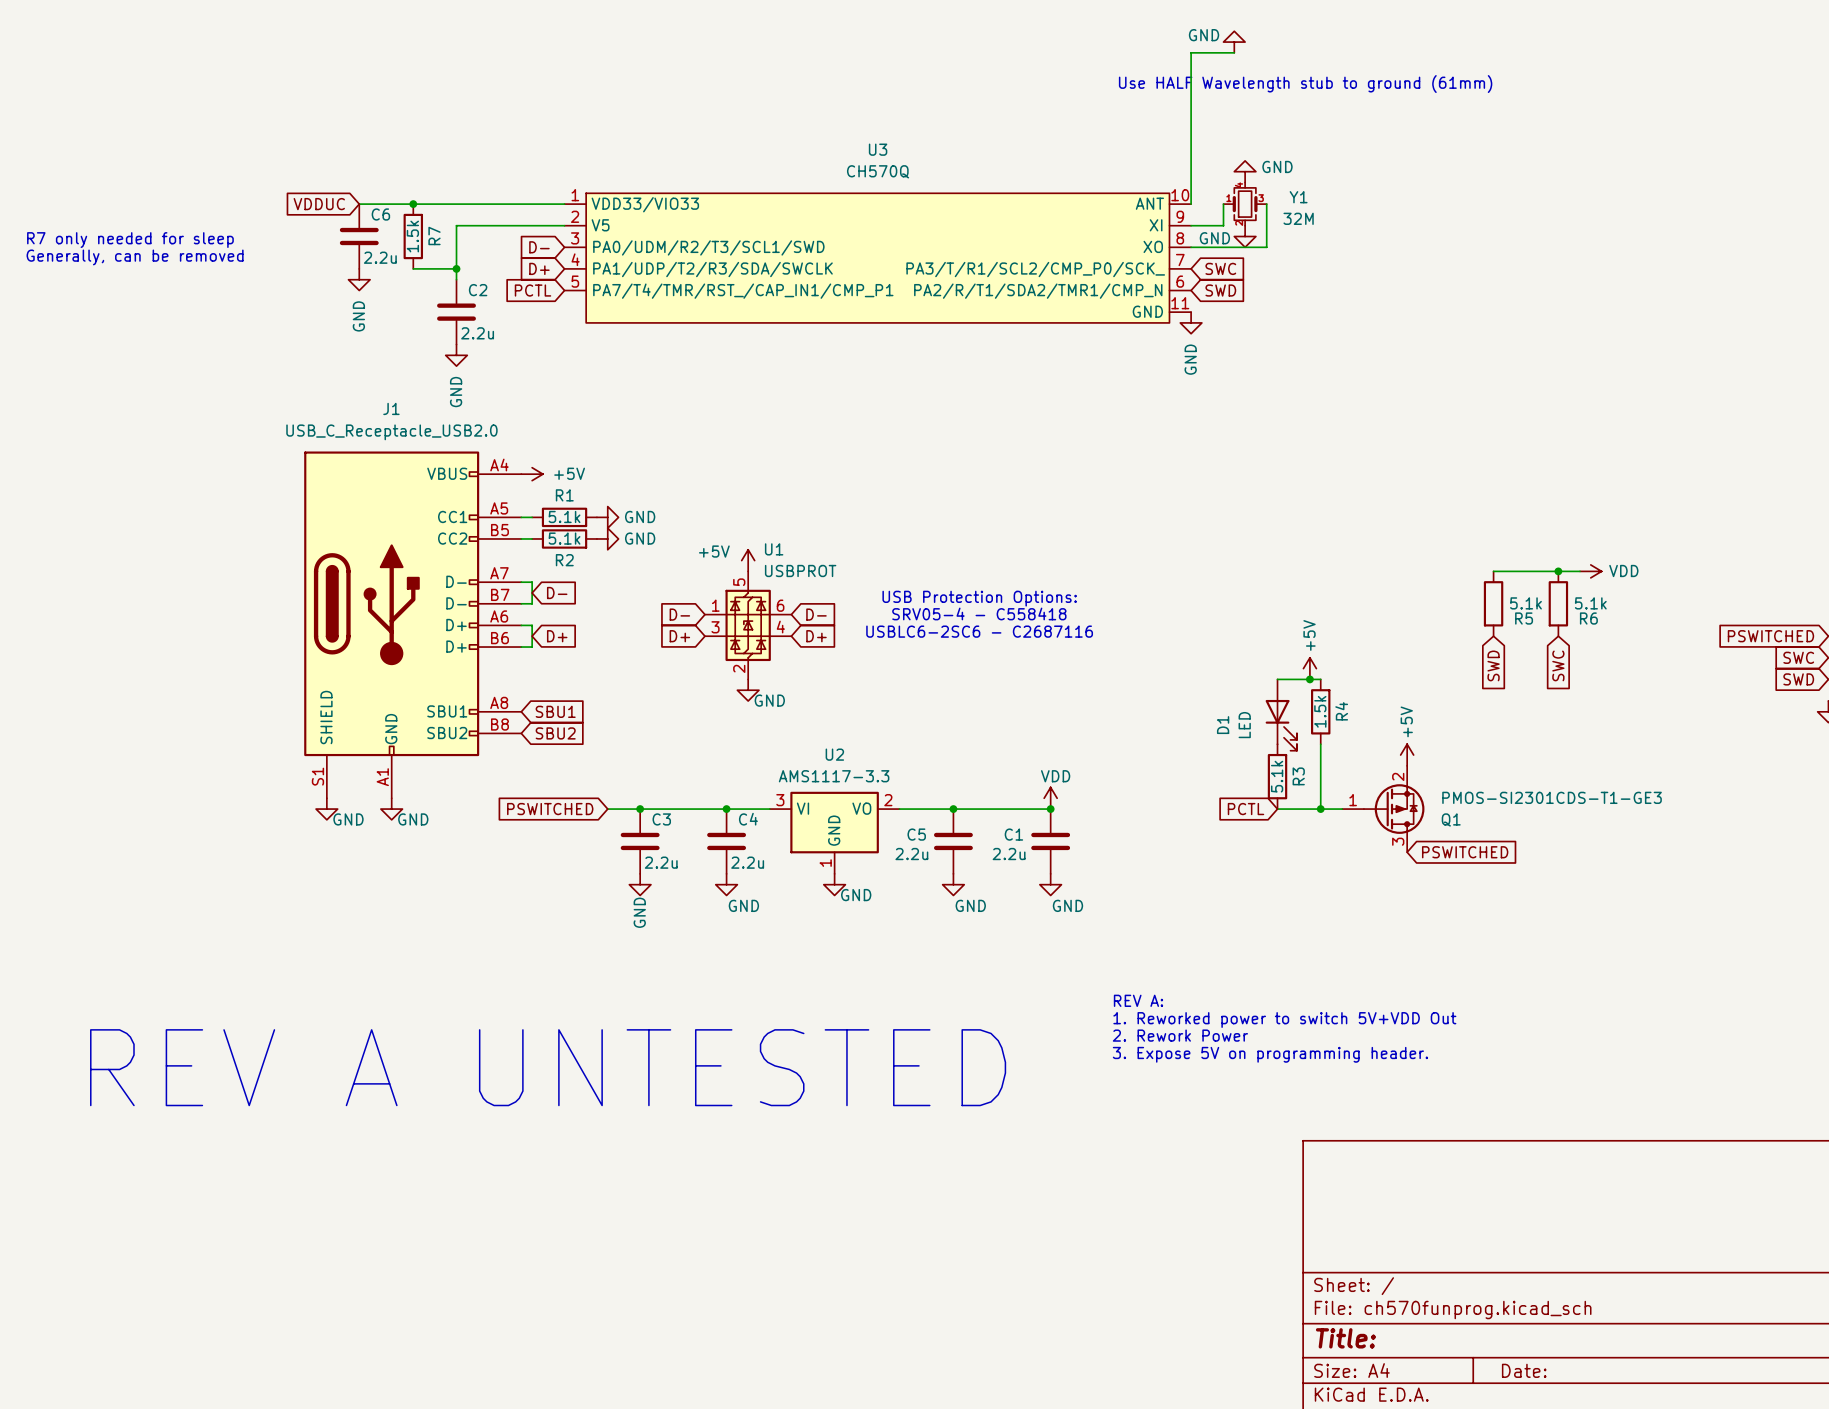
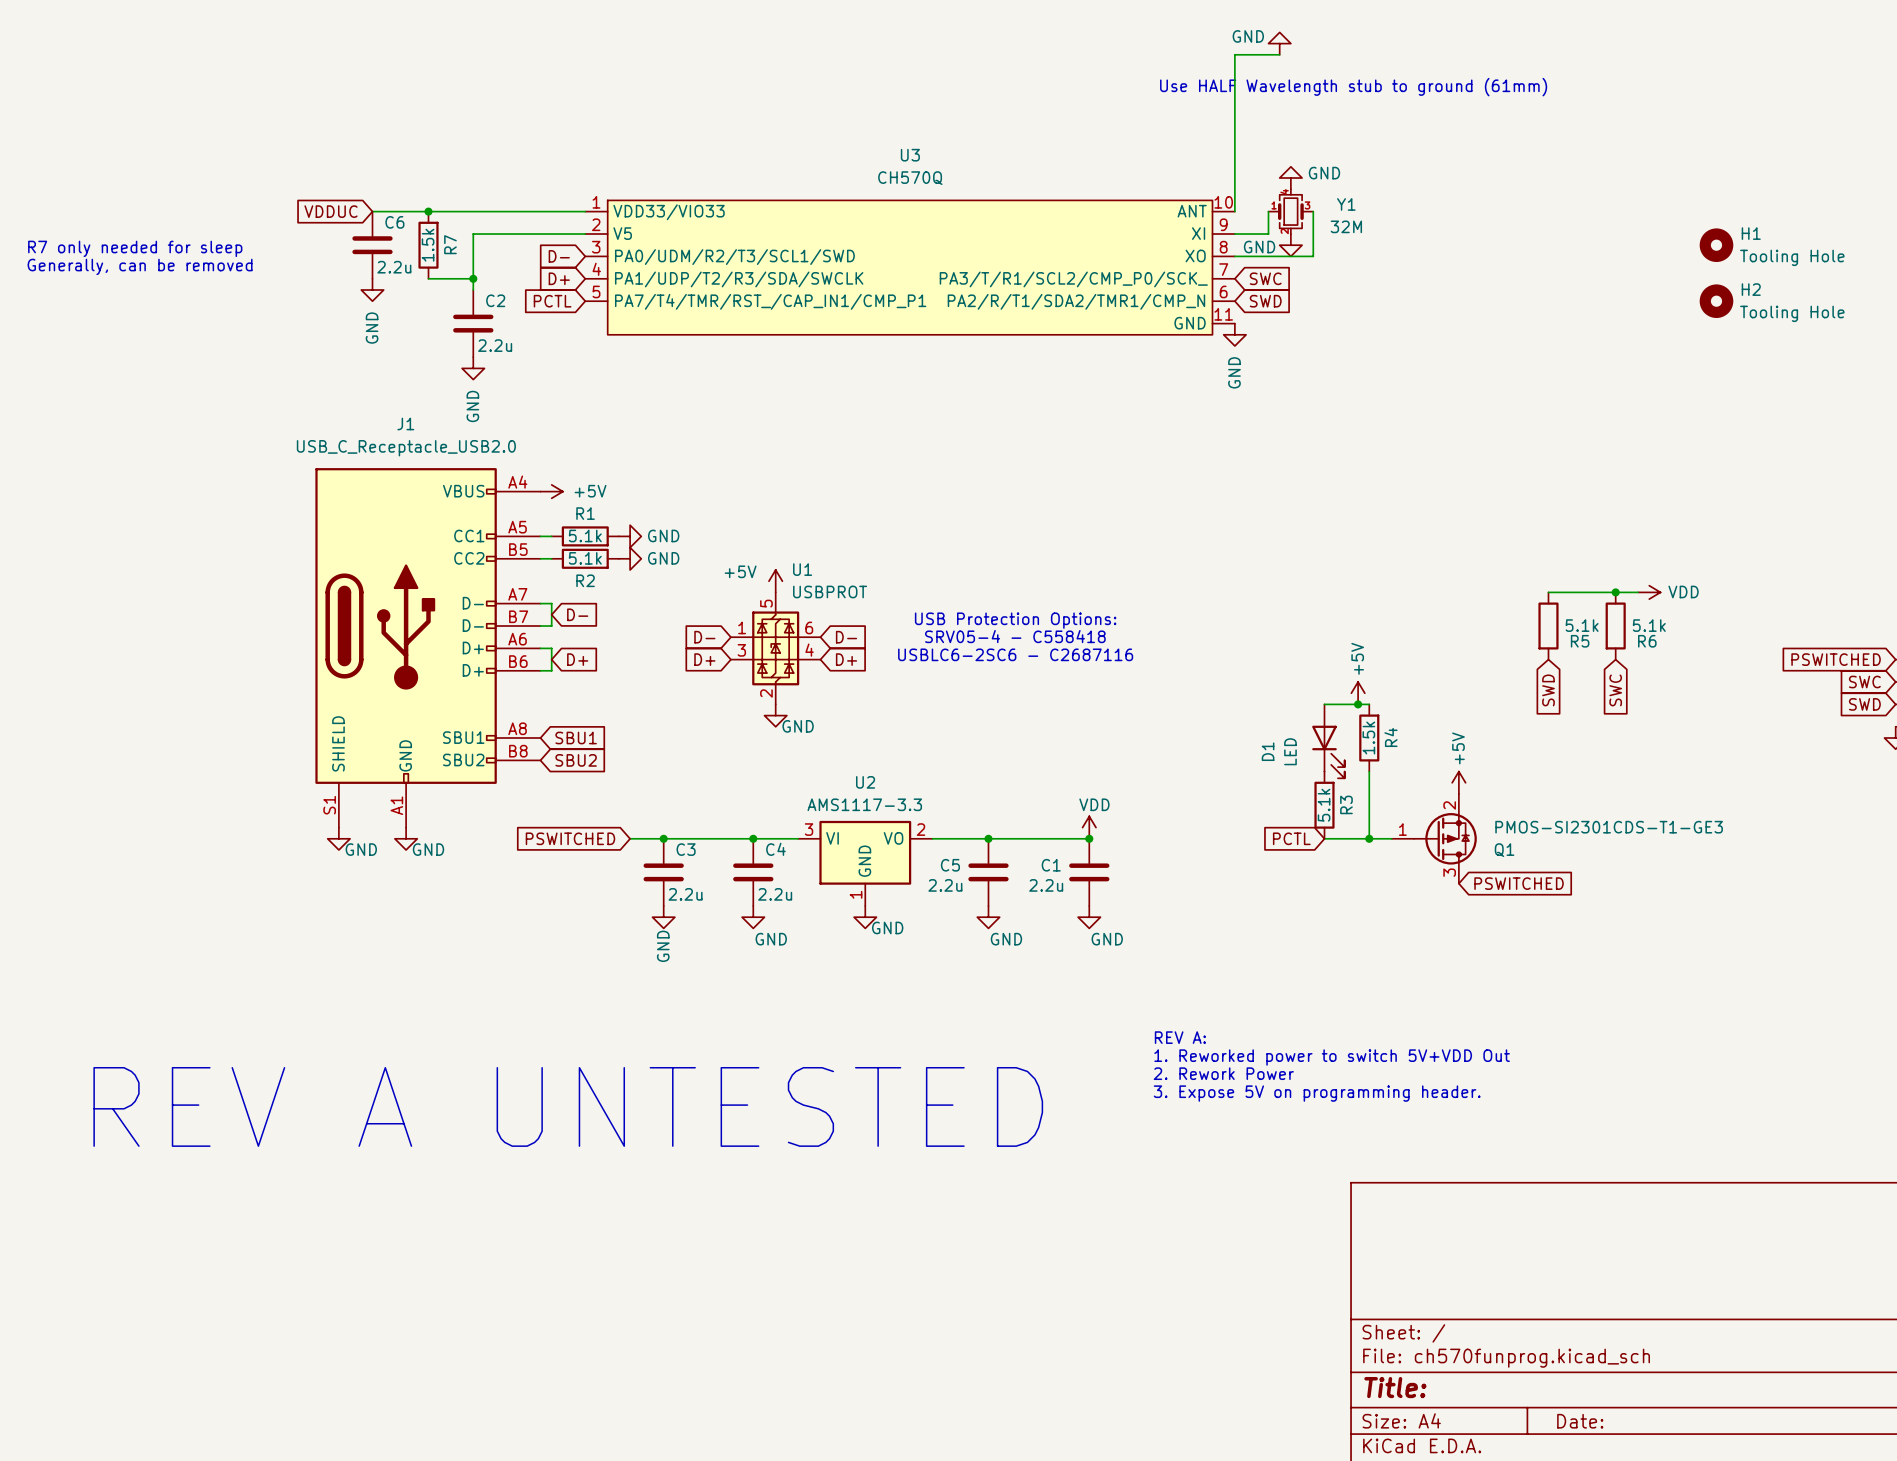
H1: none -> Tooling Hole (1716, 245)
H2: none -> Tooling Hole (1716, 301)

